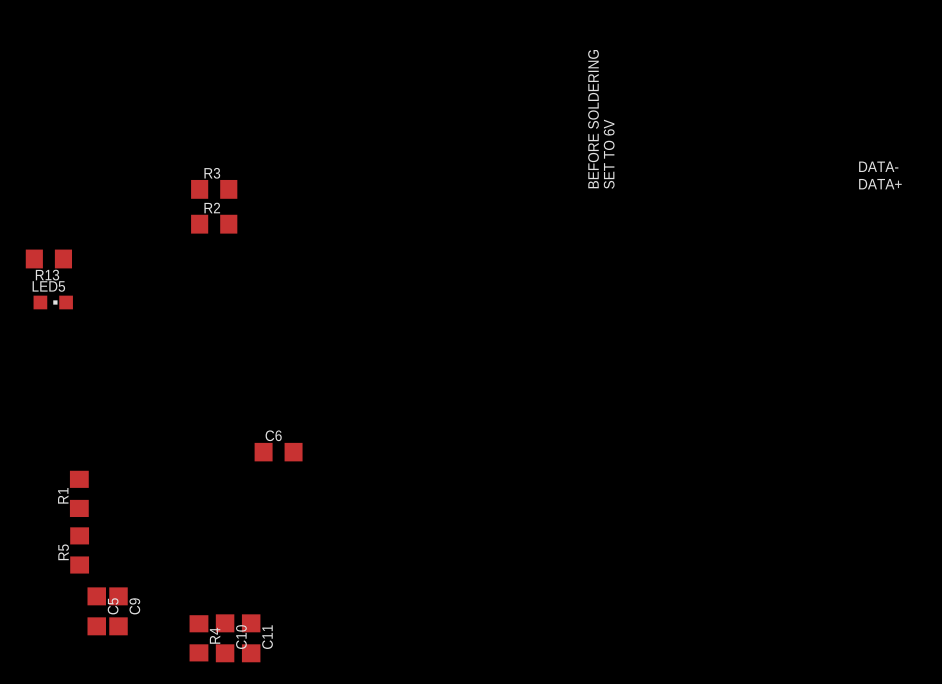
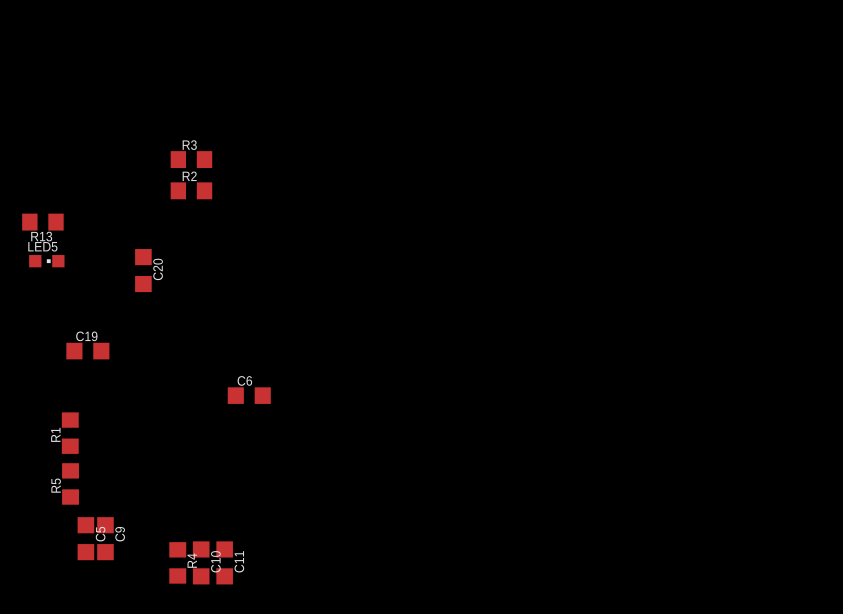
text: BEFORE SOLDERING (593, 119) -> none
text: SET TO 6V (609, 154) -> none
text: DATA- (878, 166) -> none
text: DATA+ (880, 184) -> none
C20: none -> (143, 270)
C19: none -> (87, 351)

